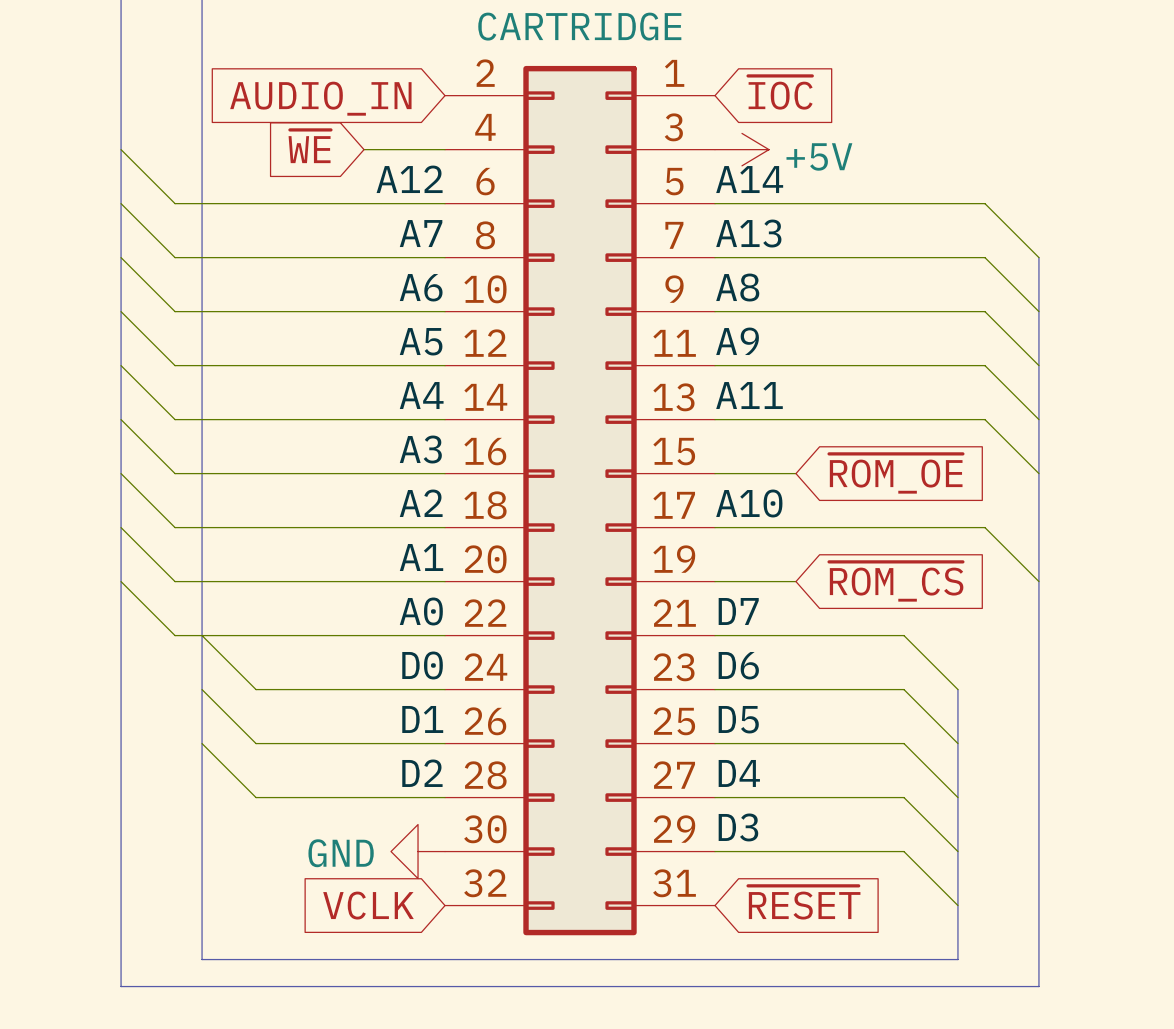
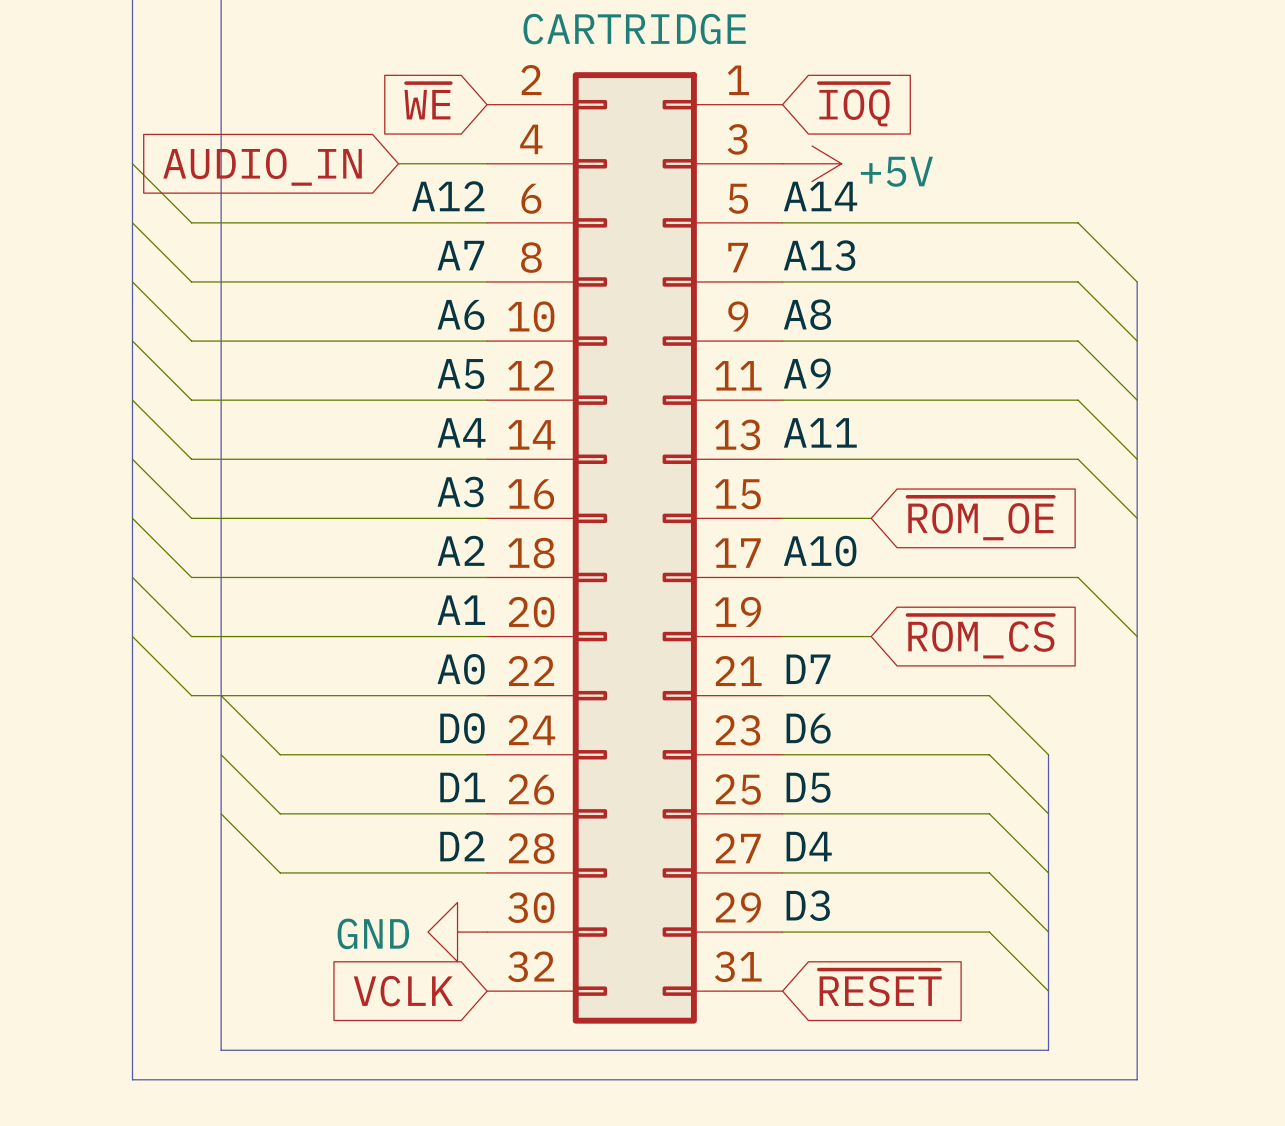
global label: ~{IOC} (780, 92) -> ~{IOQ} (854, 104)
global label: AUDIO_IN (320, 98) -> ~{WE} (427, 101)
global label: ~{WE} (309, 146) -> AUDIO_IN (262, 167)

